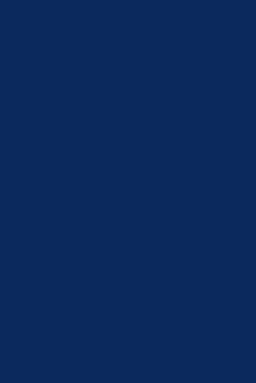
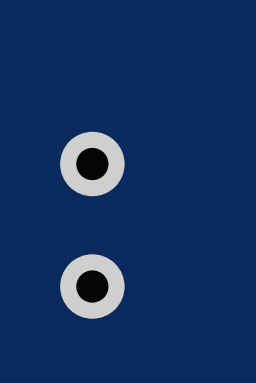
part: none -> (92, 225)

